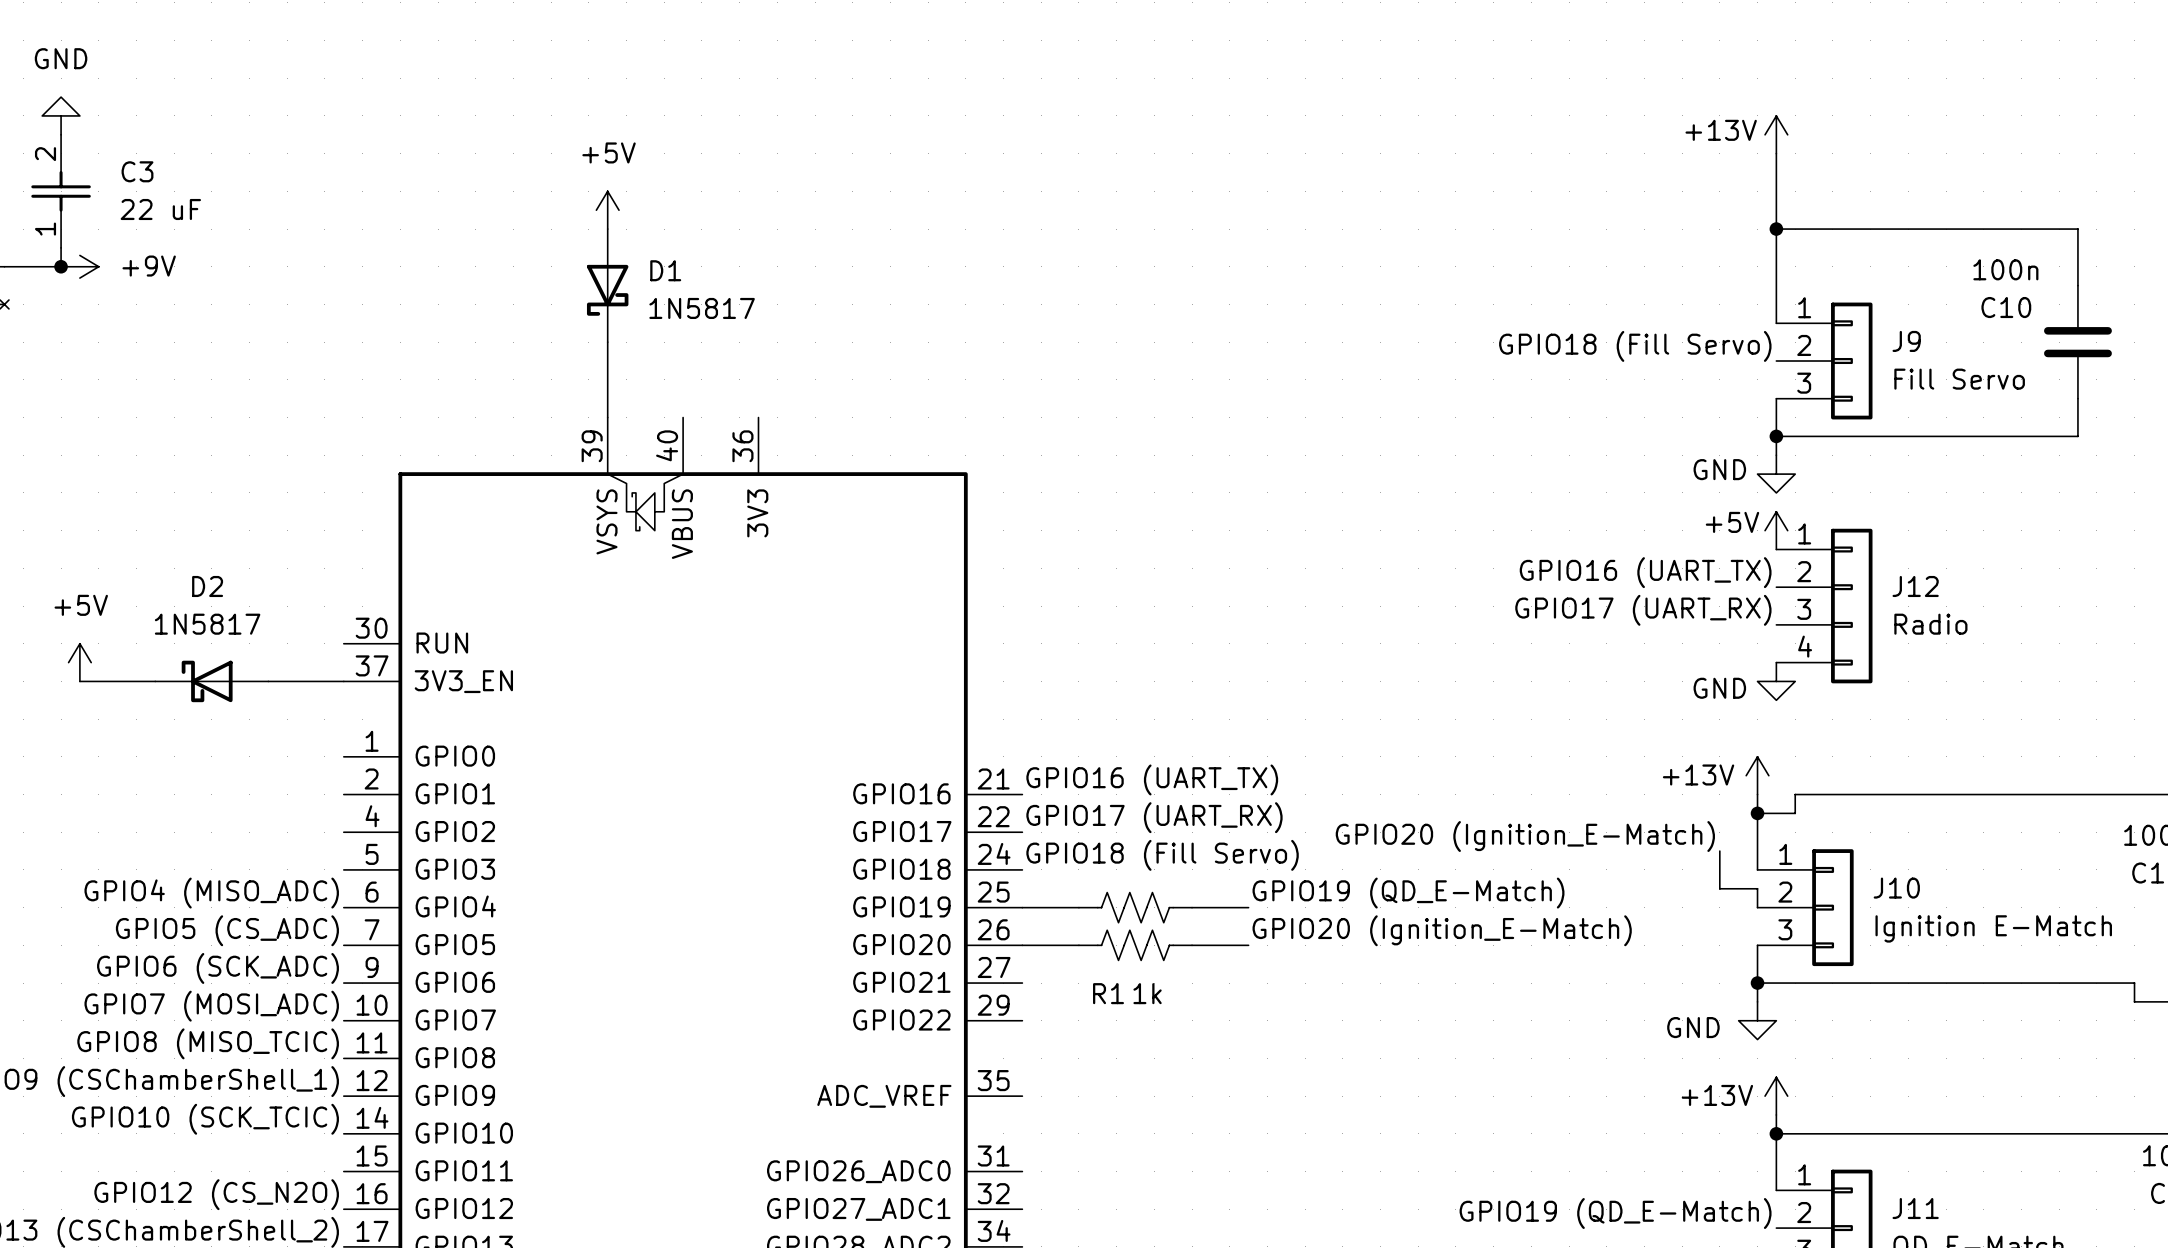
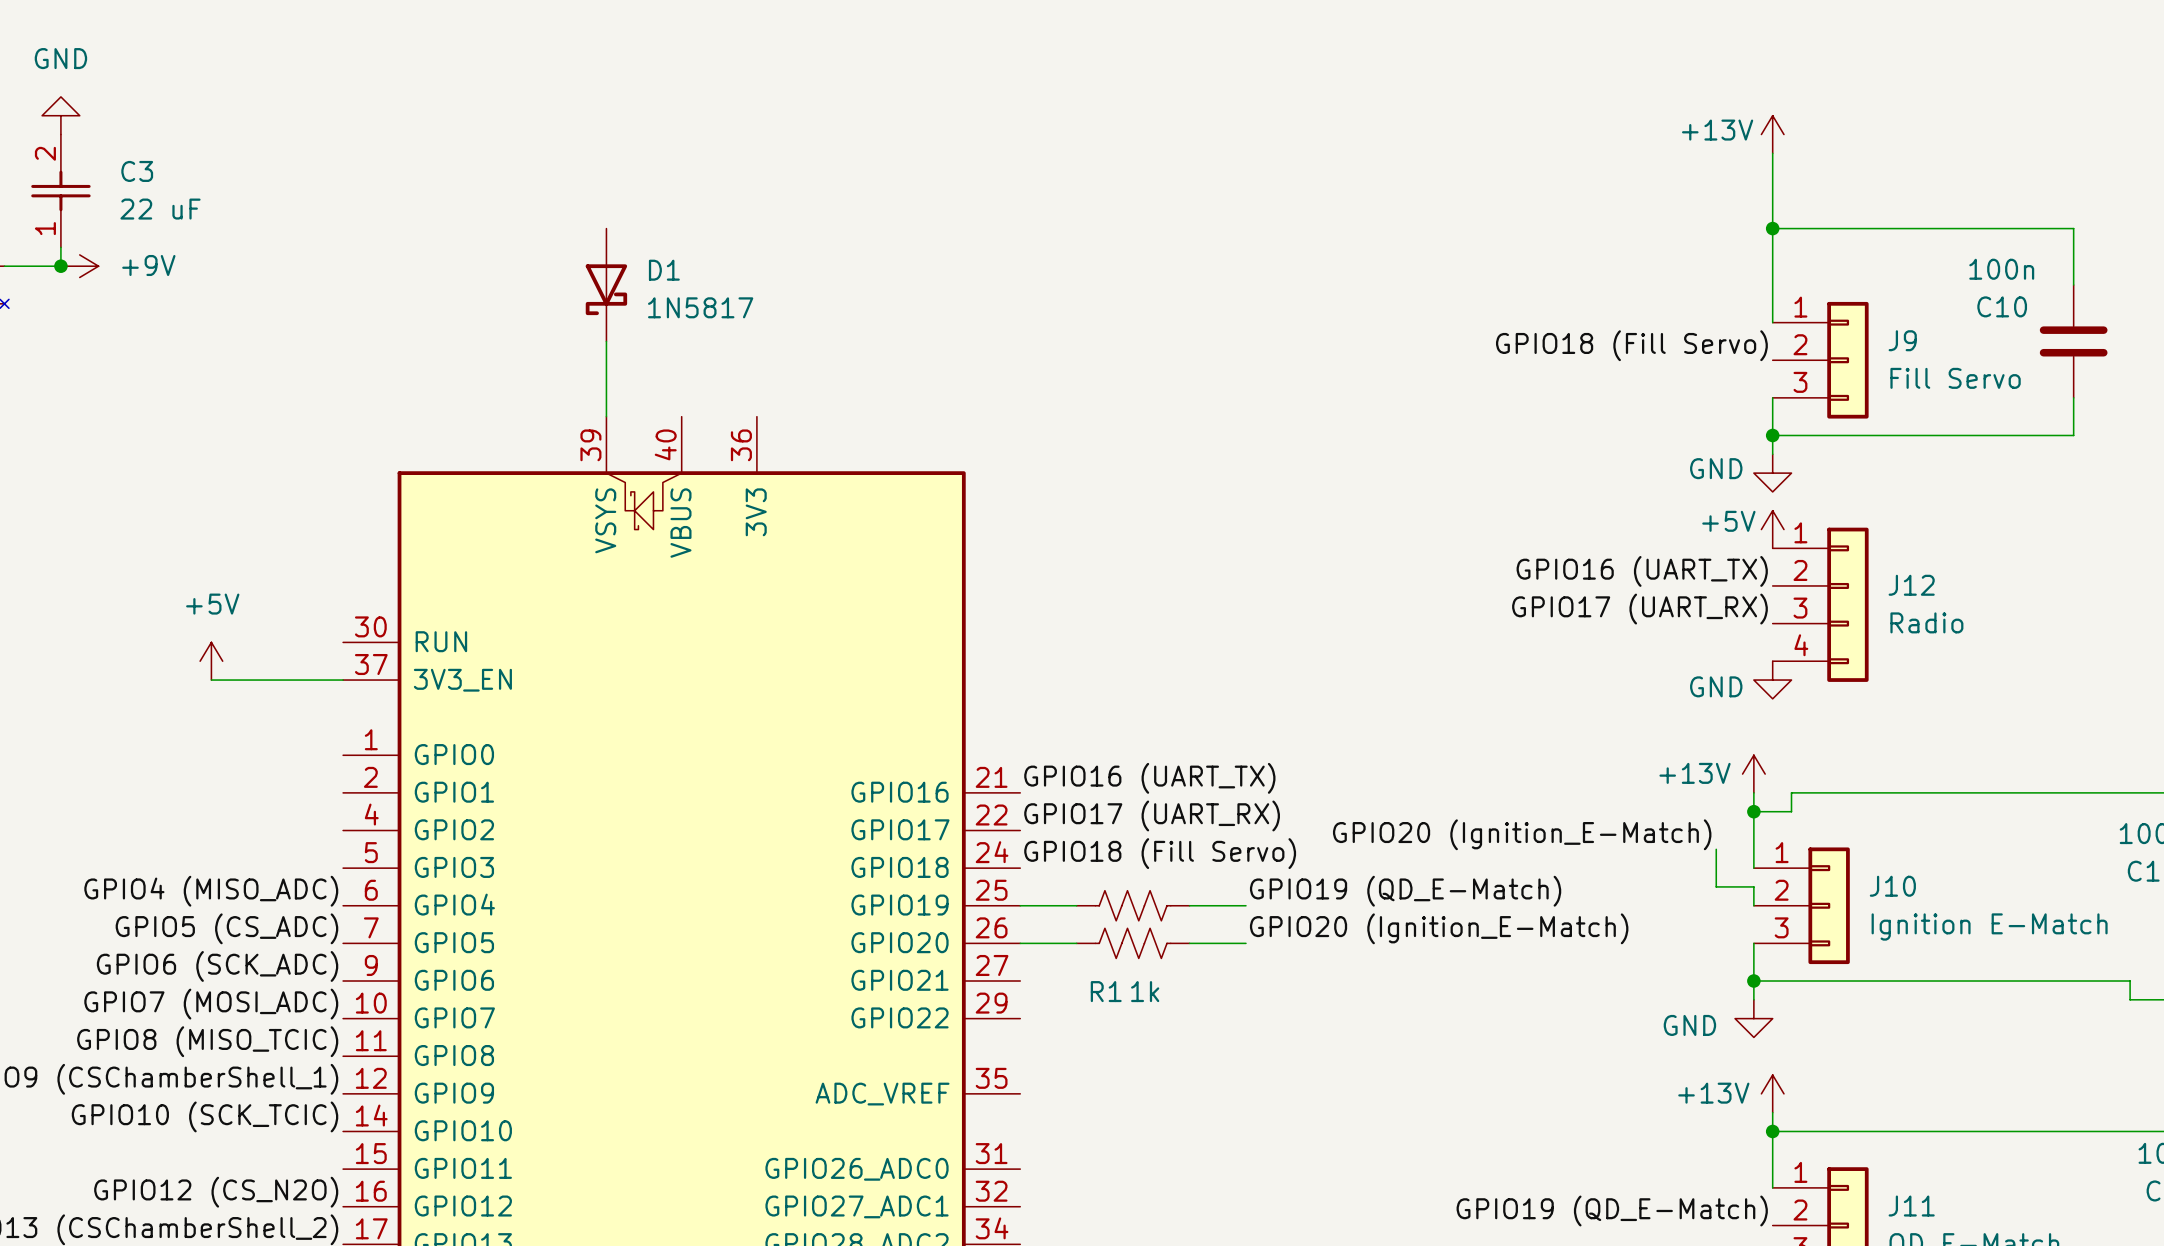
power symbol: +5V (607, 210) -> none
power symbol position: +5V (79, 662) -> +5V (211, 661)
wire: (79, 681) (155, 681) -> none
D2: 1N5817 (211, 681) -> none

